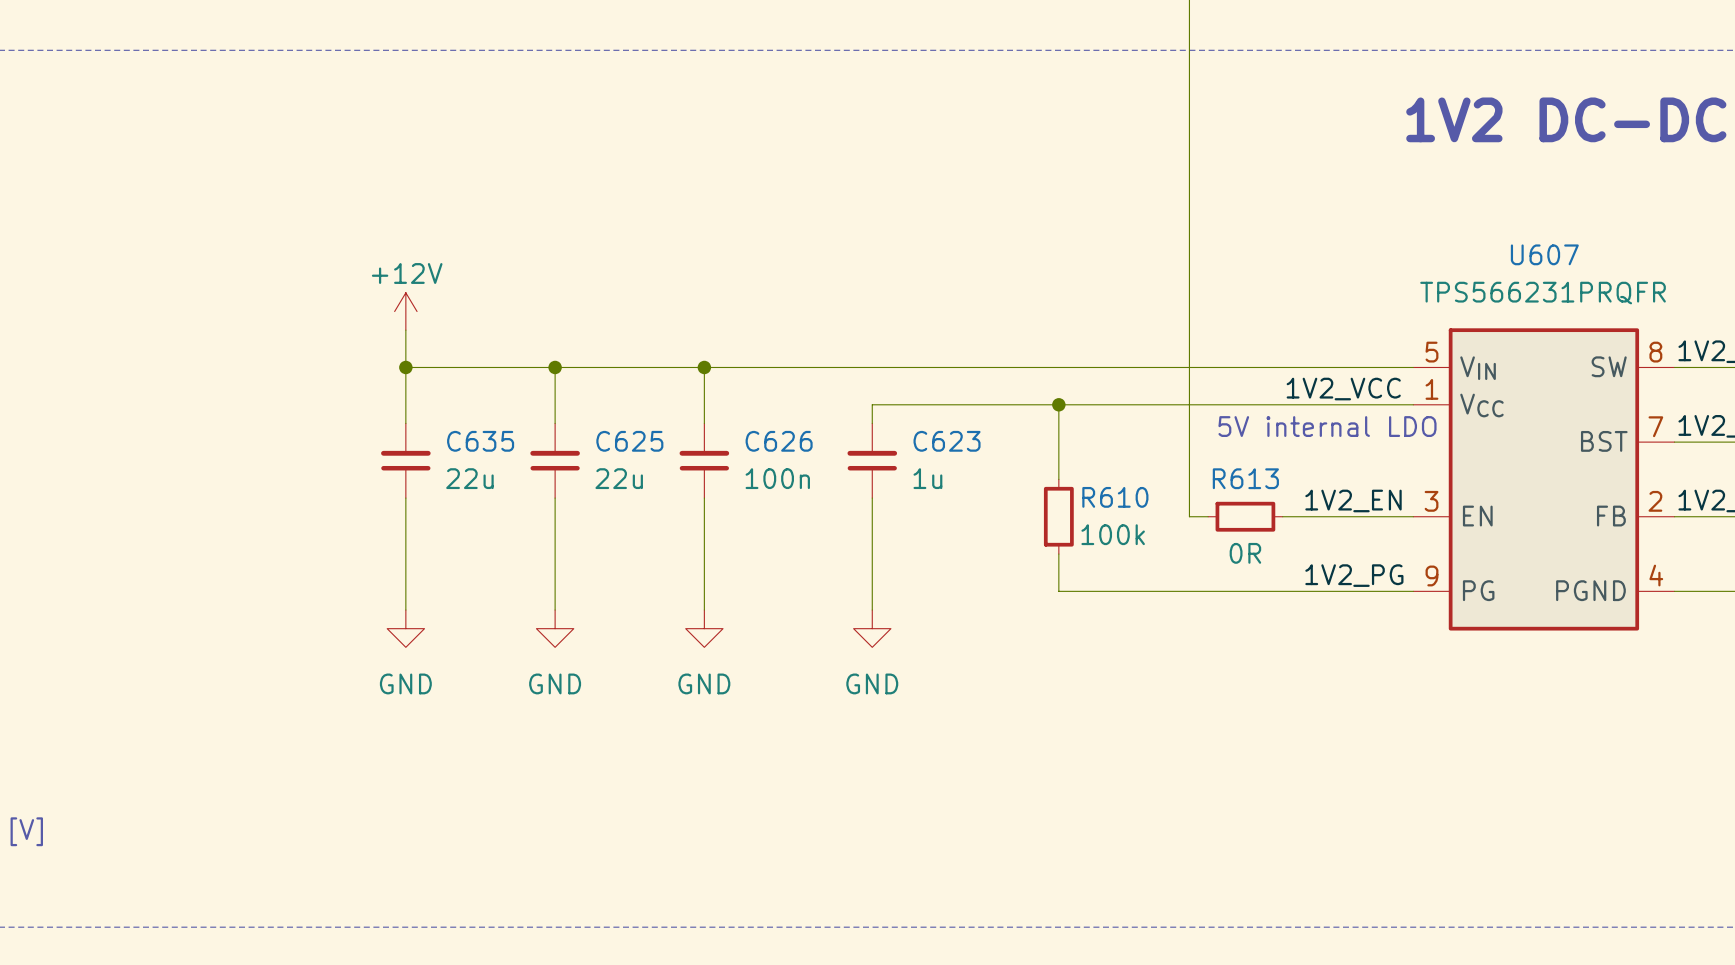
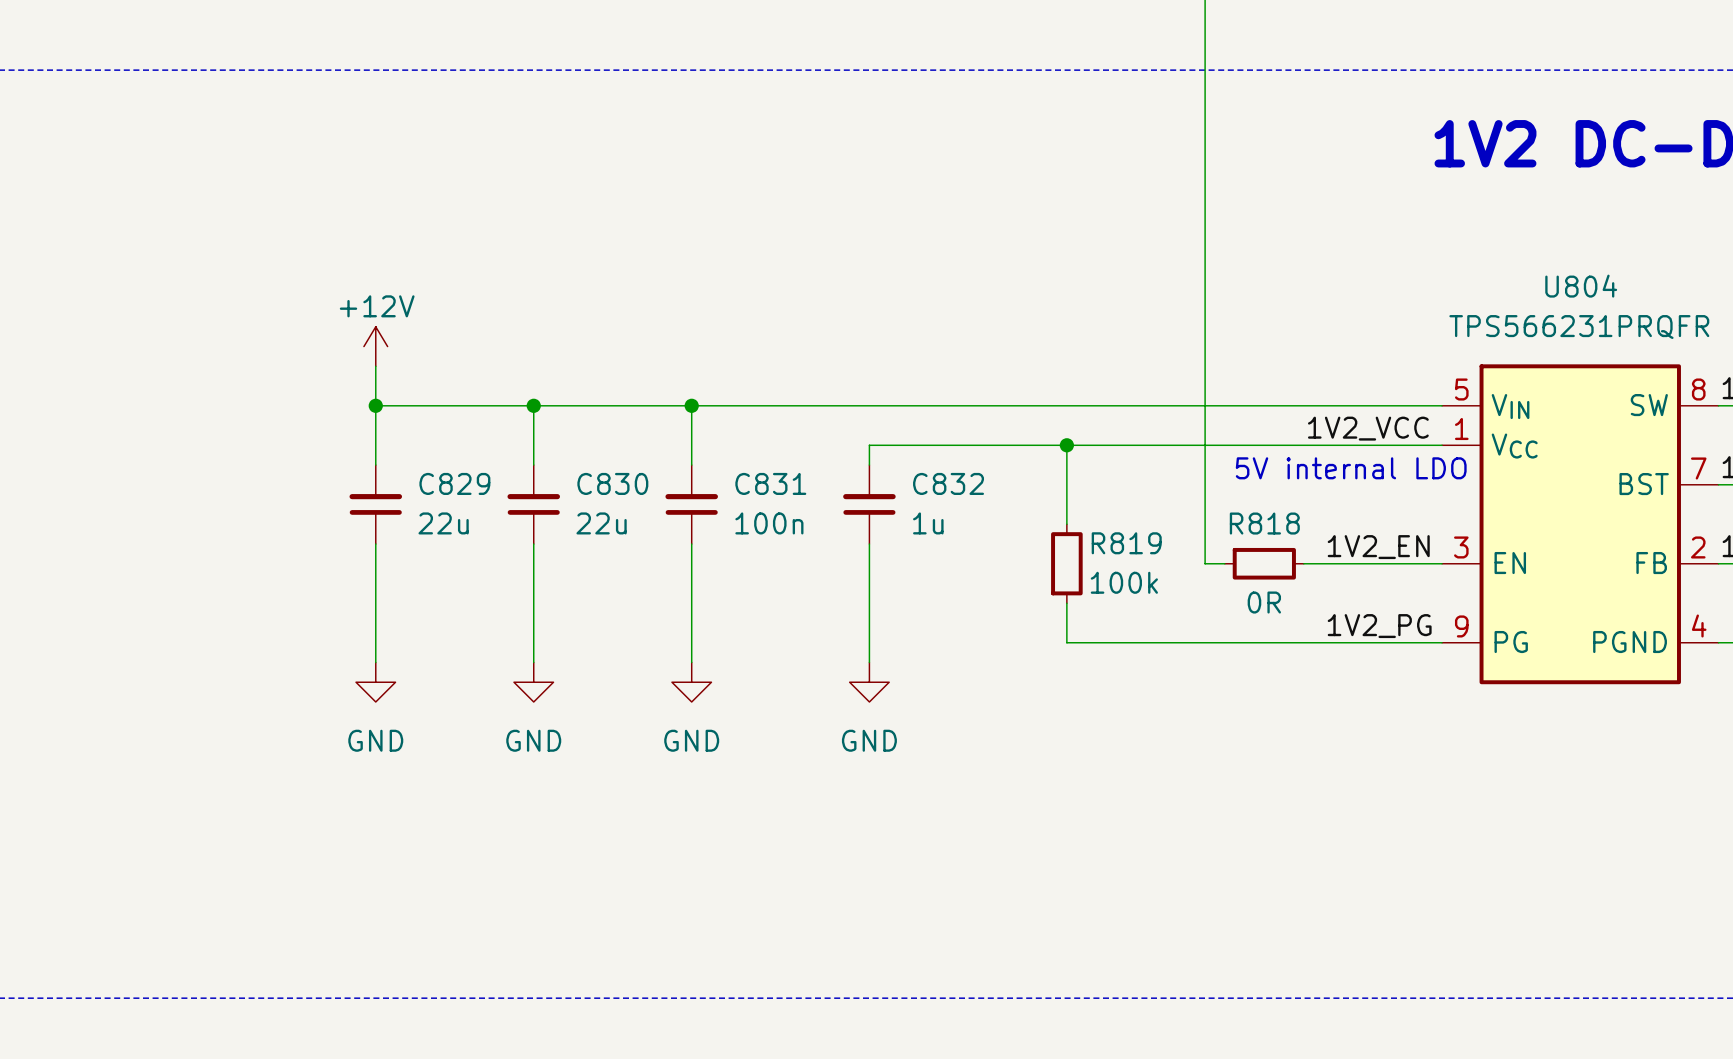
U607 name: U607 (1544, 254) -> U804 (1581, 286)
C635 name: C635 (480, 441) -> C829 (454, 483)
C625 name: C625 (629, 441) -> C830 (612, 483)
C626 name: C626 (779, 441) -> C831 (770, 483)
C623 name: C623 (947, 441) -> C832 (948, 483)
R613 name: R613 (1245, 478) -> R818 (1264, 523)
R610 name: R610 (1115, 497) -> R819 (1126, 543)

